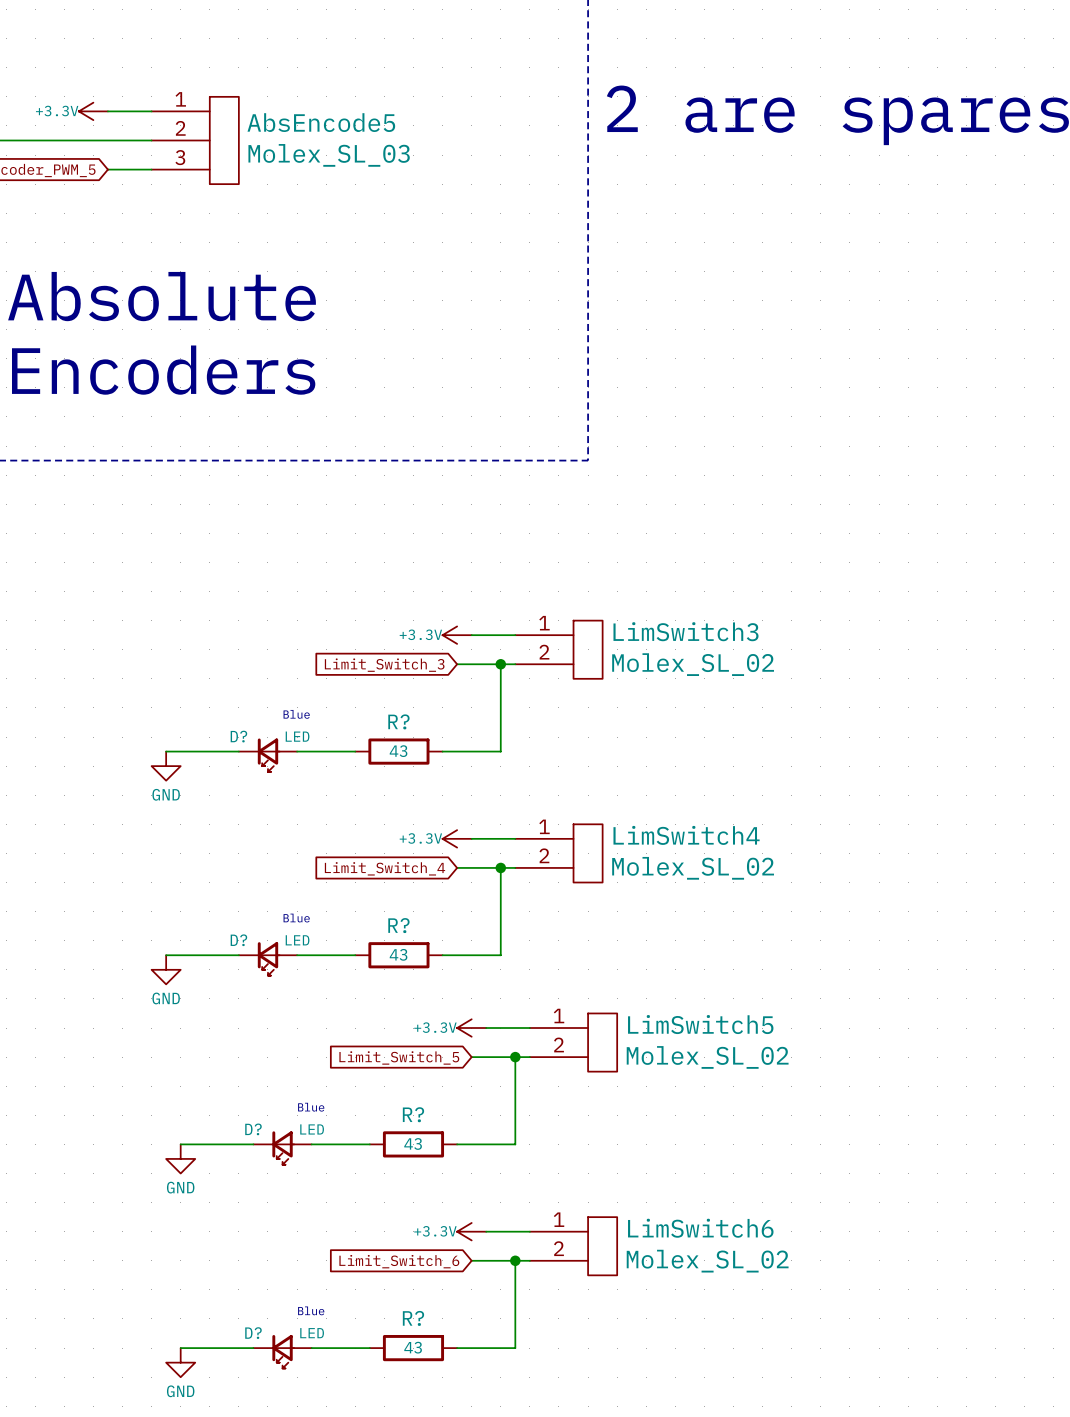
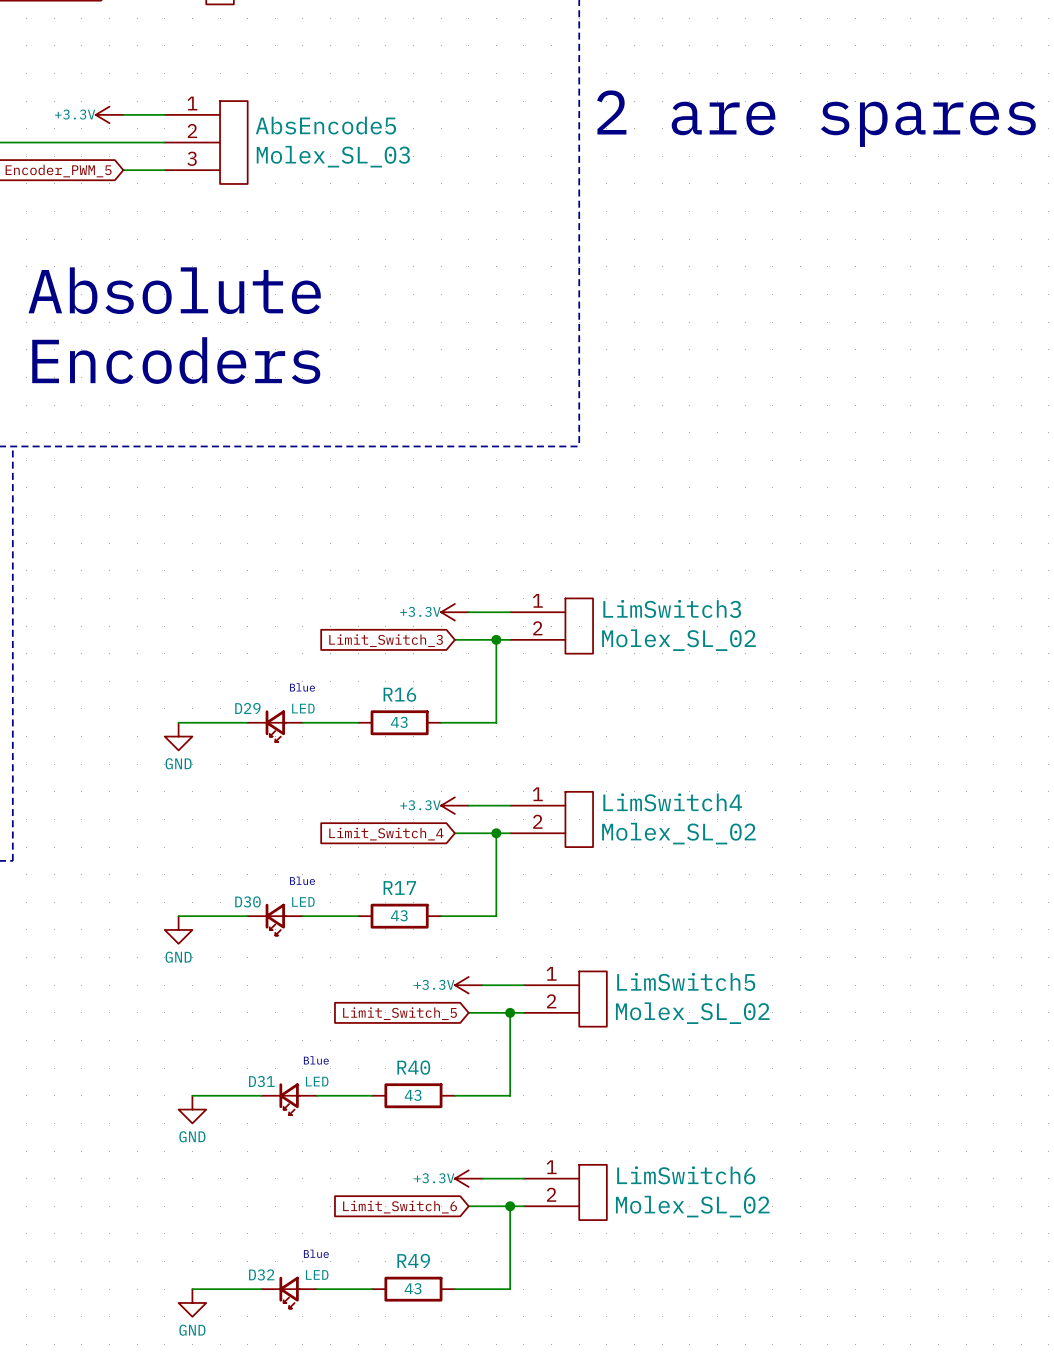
R? name: R? (398, 721) -> R16 (399, 694)
D? name: D? (238, 736) -> D29 (247, 708)
R? name: R? (398, 925) -> R17 (399, 888)
D? name: D? (238, 940) -> D30 (247, 901)
R? name: R? (413, 1114) -> R40 (413, 1067)
D? name: D? (253, 1129) -> D31 (261, 1081)
R? name: R? (413, 1318) -> R49 (413, 1260)
D? name: D? (253, 1333) -> D32 (261, 1274)

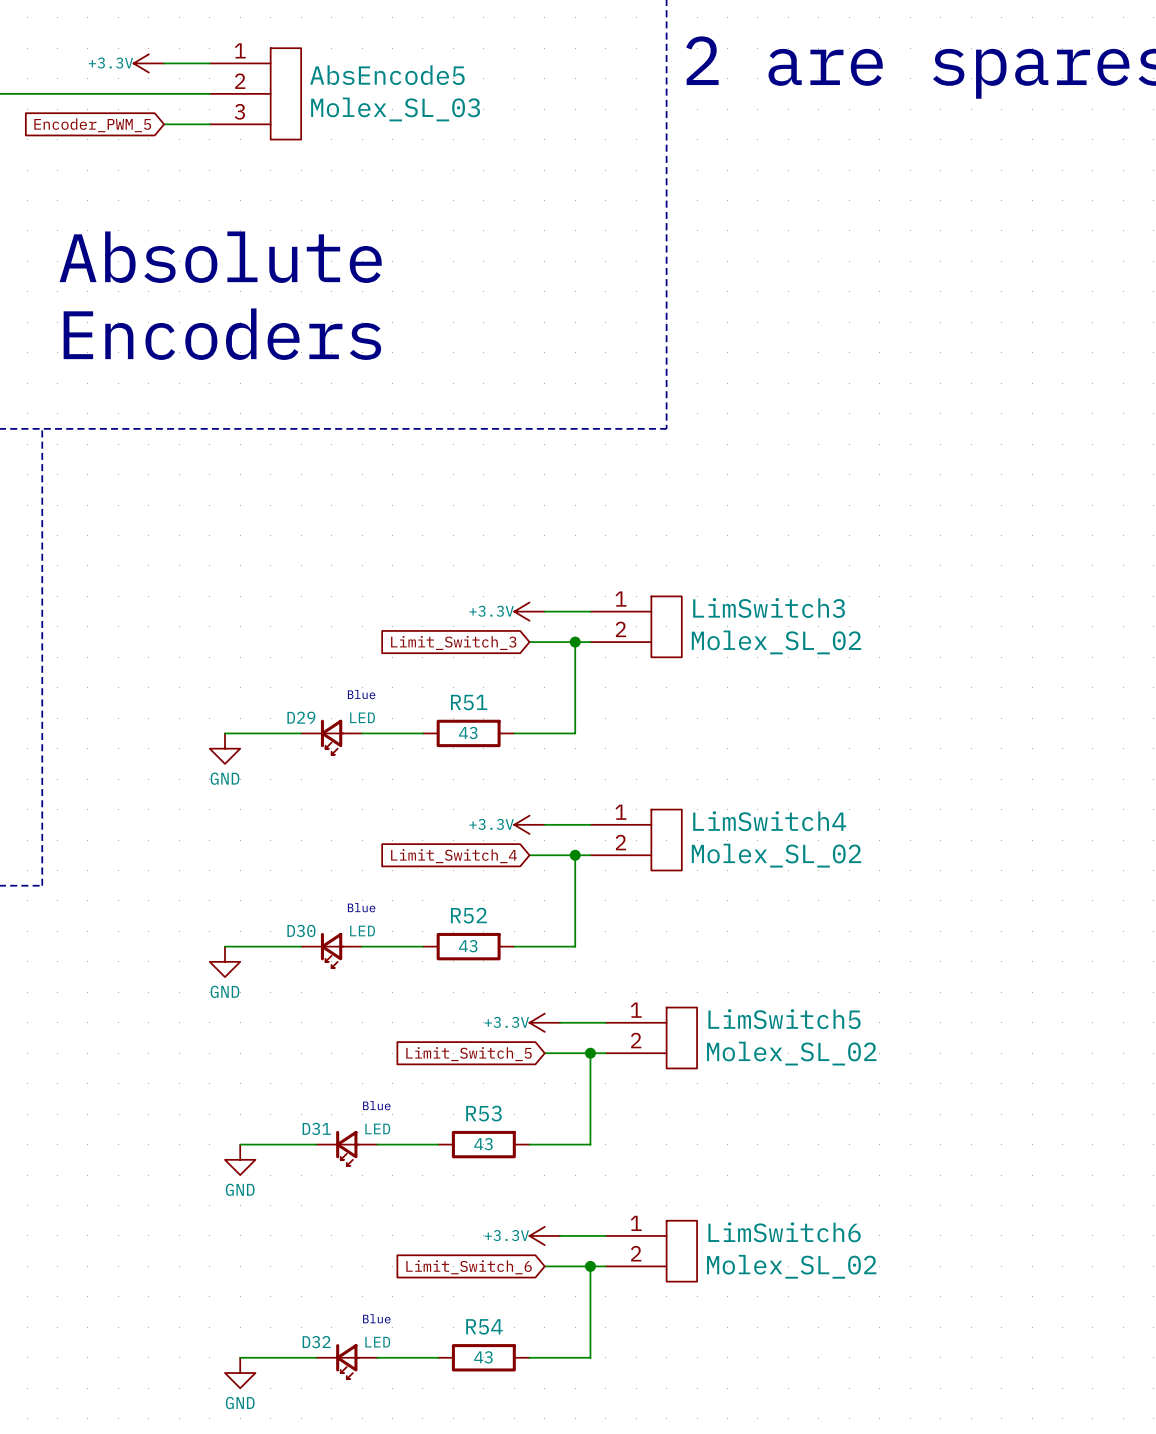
R16 name: R16 (399, 694) -> R51 (469, 702)
R17 name: R17 (399, 888) -> R52 (468, 915)
R40 name: R40 (413, 1067) -> R53 (483, 1113)
R49 name: R49 (413, 1260) -> R54 (484, 1326)

